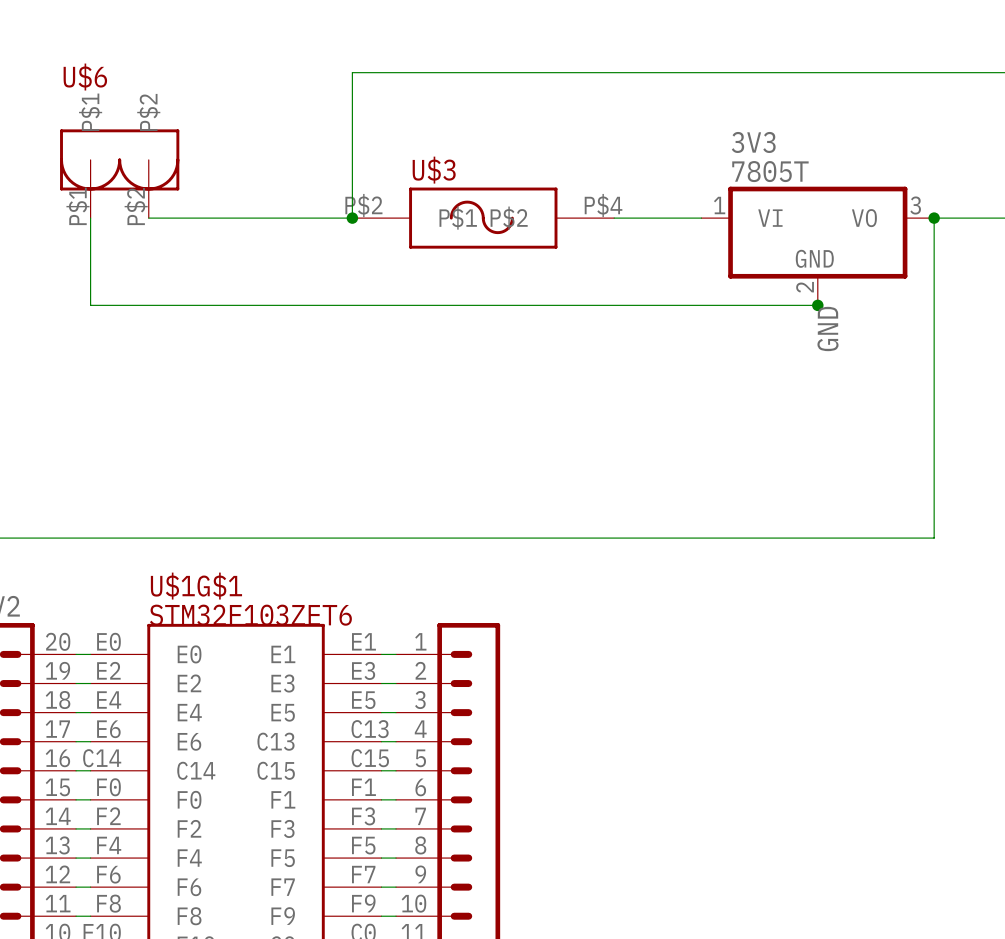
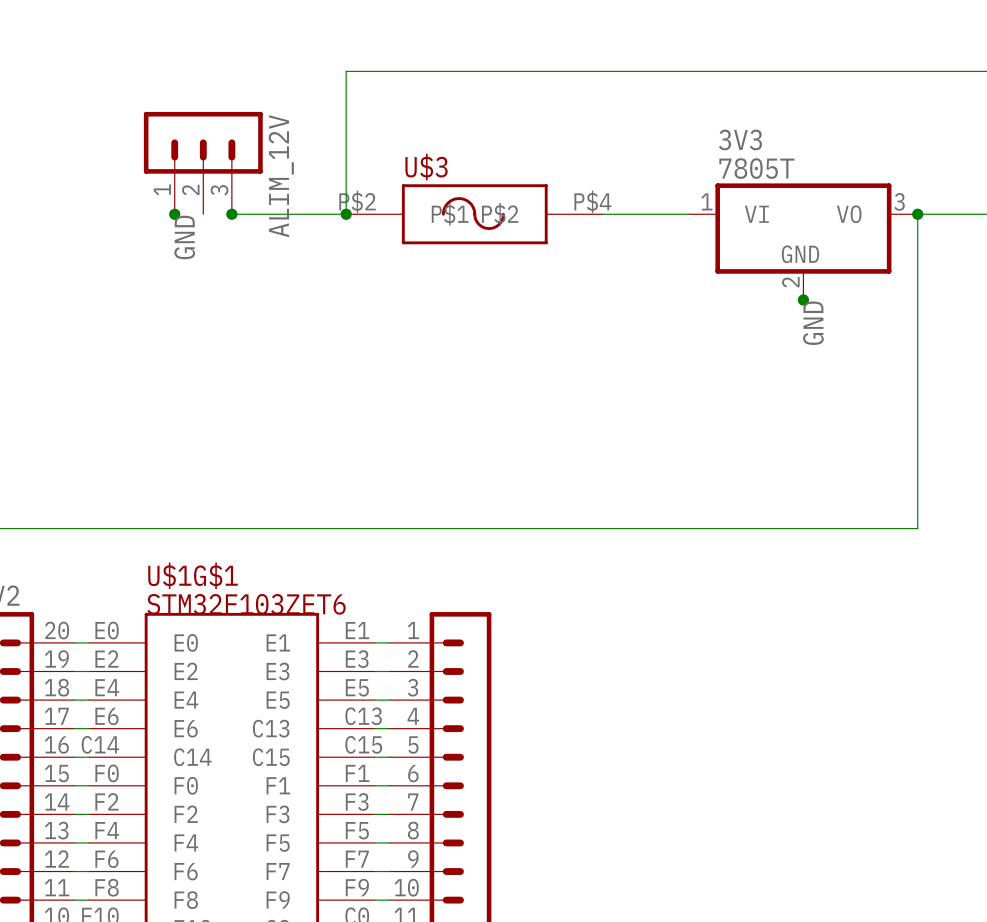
ALIM_12V: none -> (203, 163)
U$6: (119, 173) -> none
wire: (90, 218) (90, 305) (817, 305) -> none
wire: (148, 218) (236, 218) -> none
junction: none -> (174, 214)
junction: none -> (231, 214)
label: none -> GND (184, 237)

